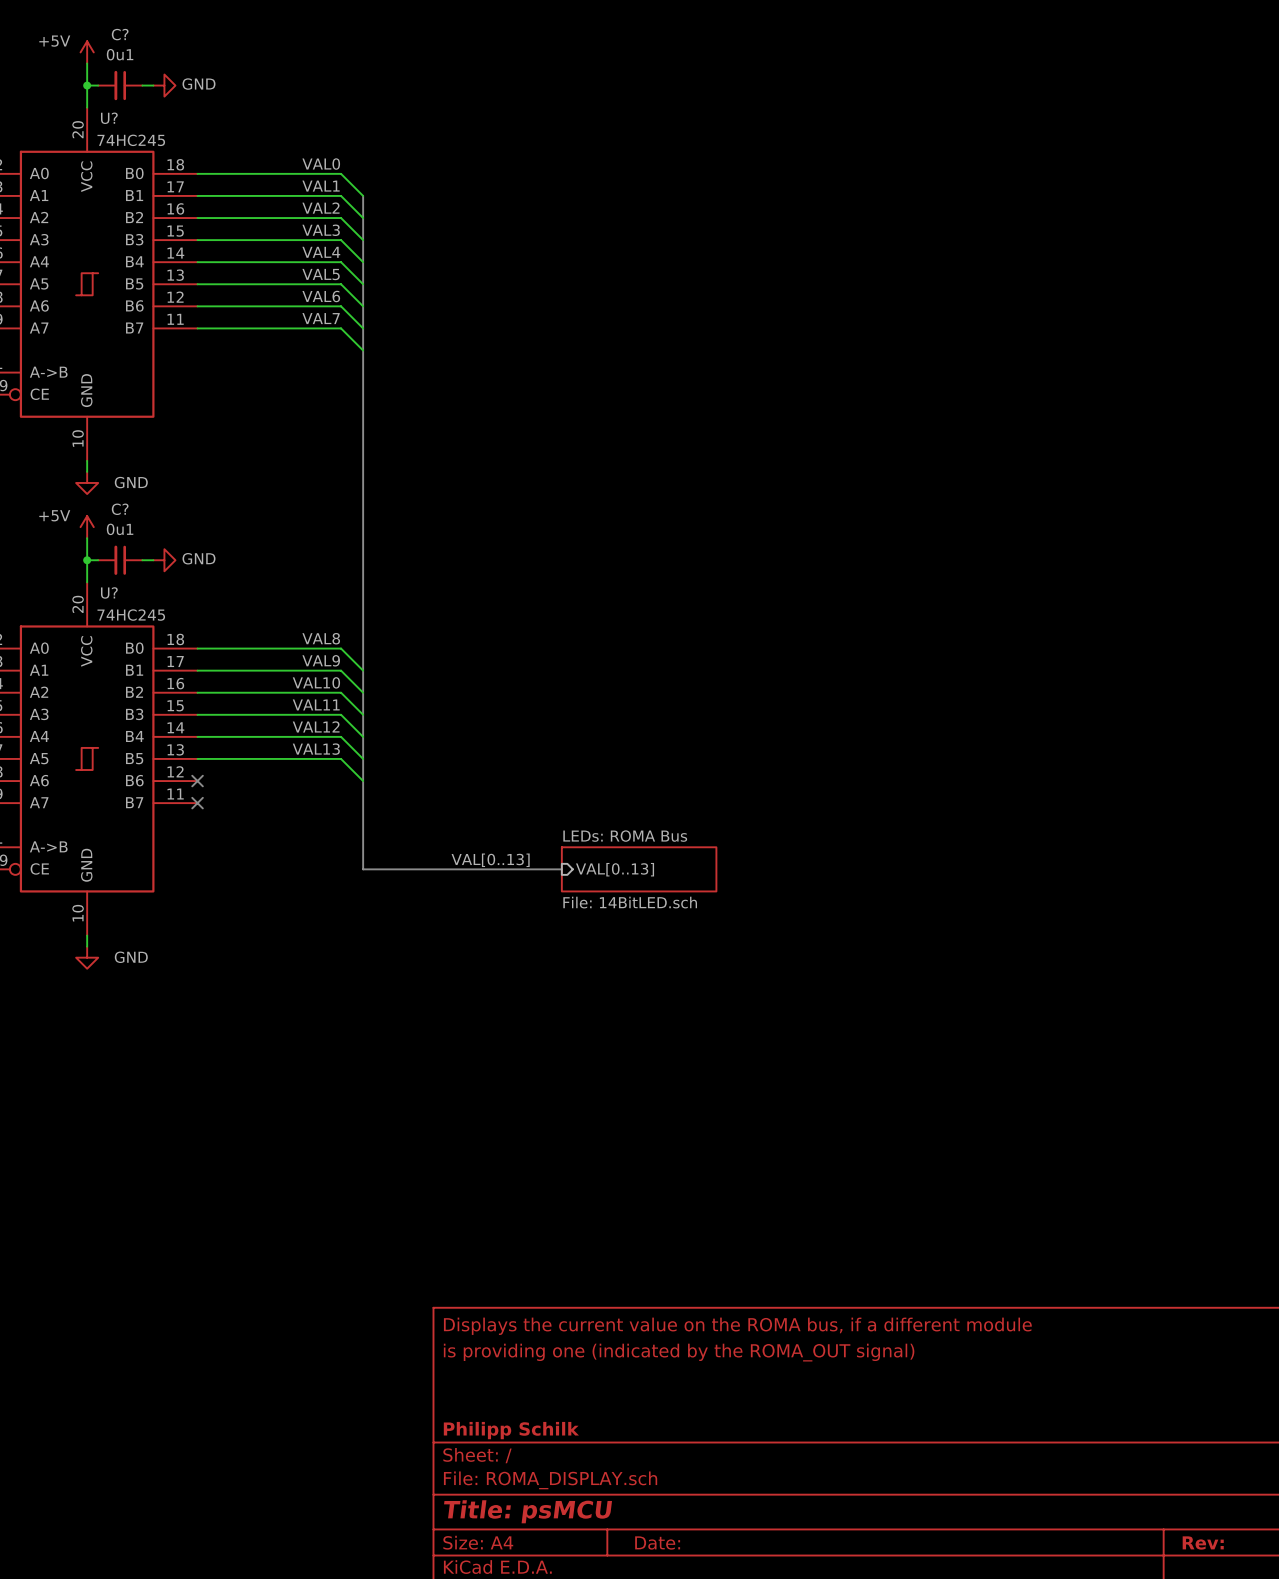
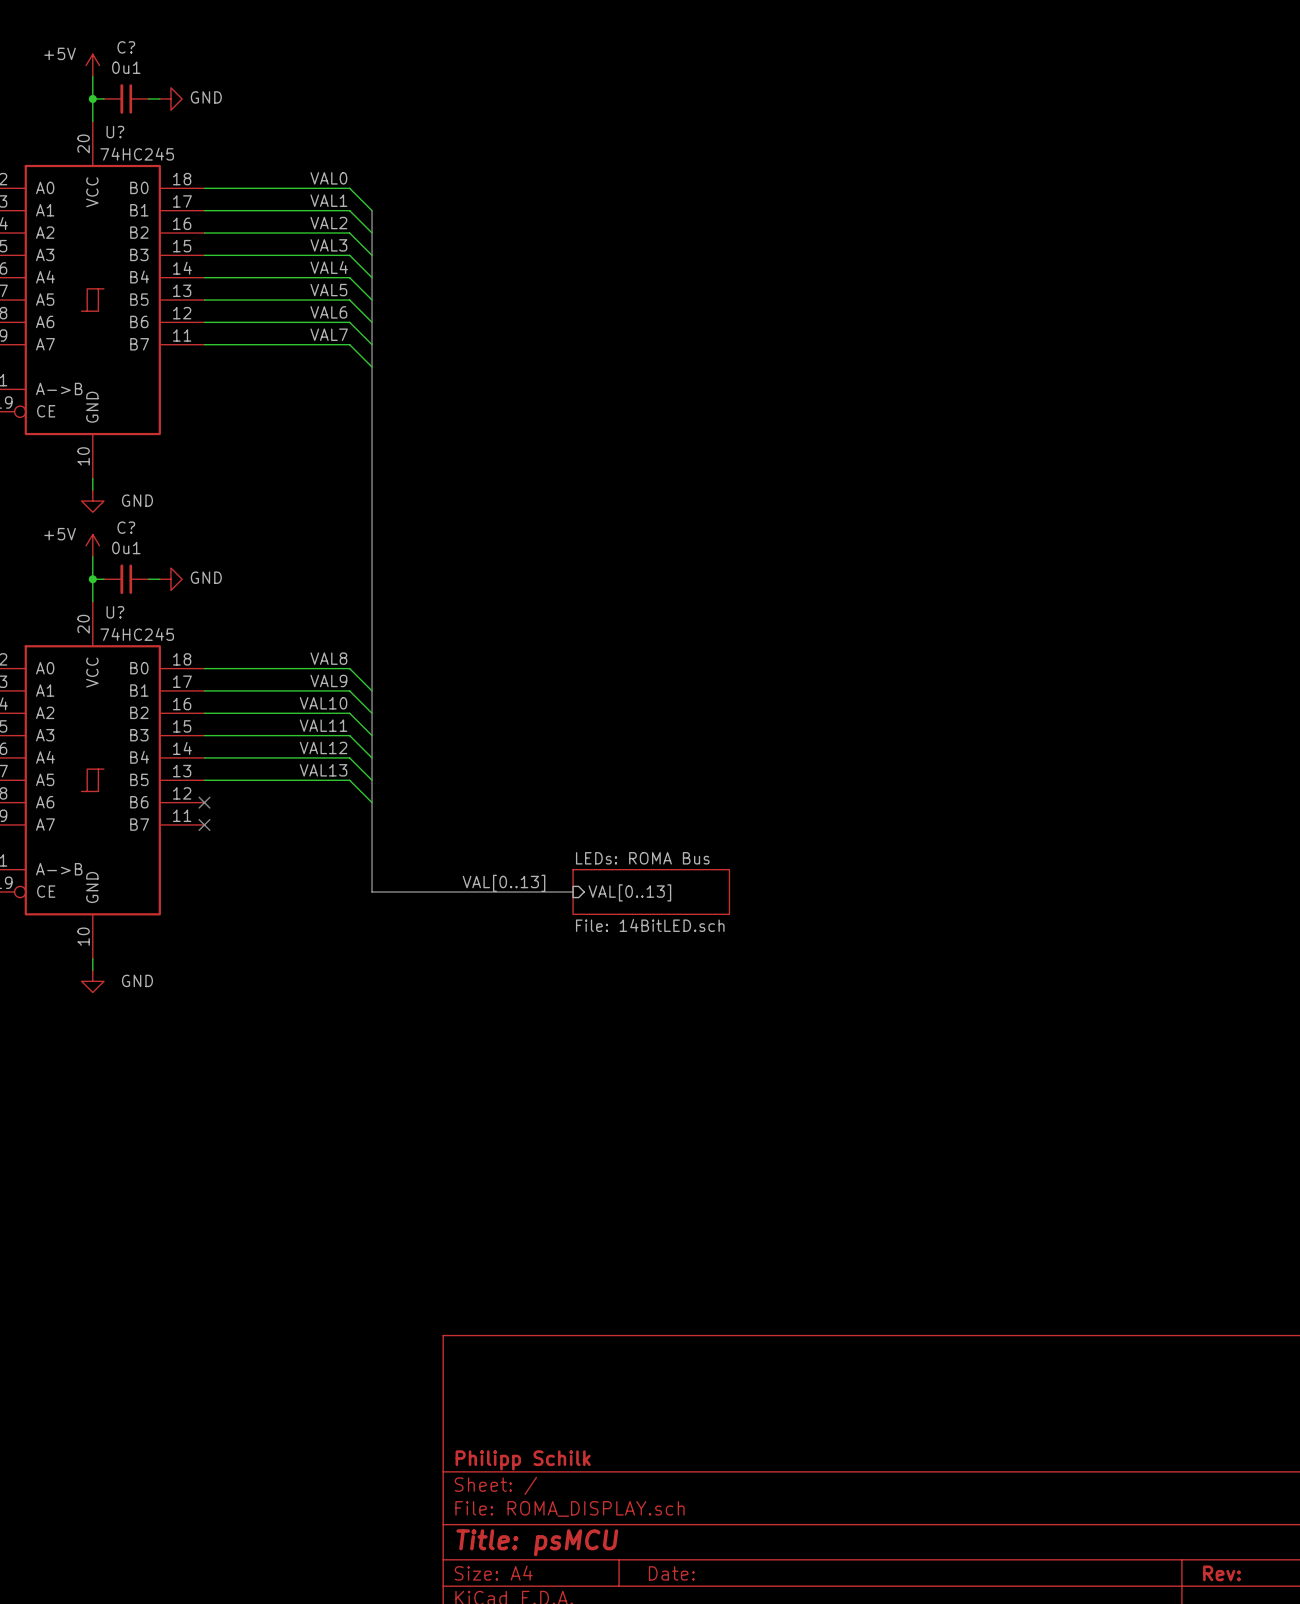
title block: Displays the current value on the ROMA bus, if a different module (737, 1326) -> none
title block: is providing one (indicated by the ROMA_OUT signal) (679, 1352) -> none

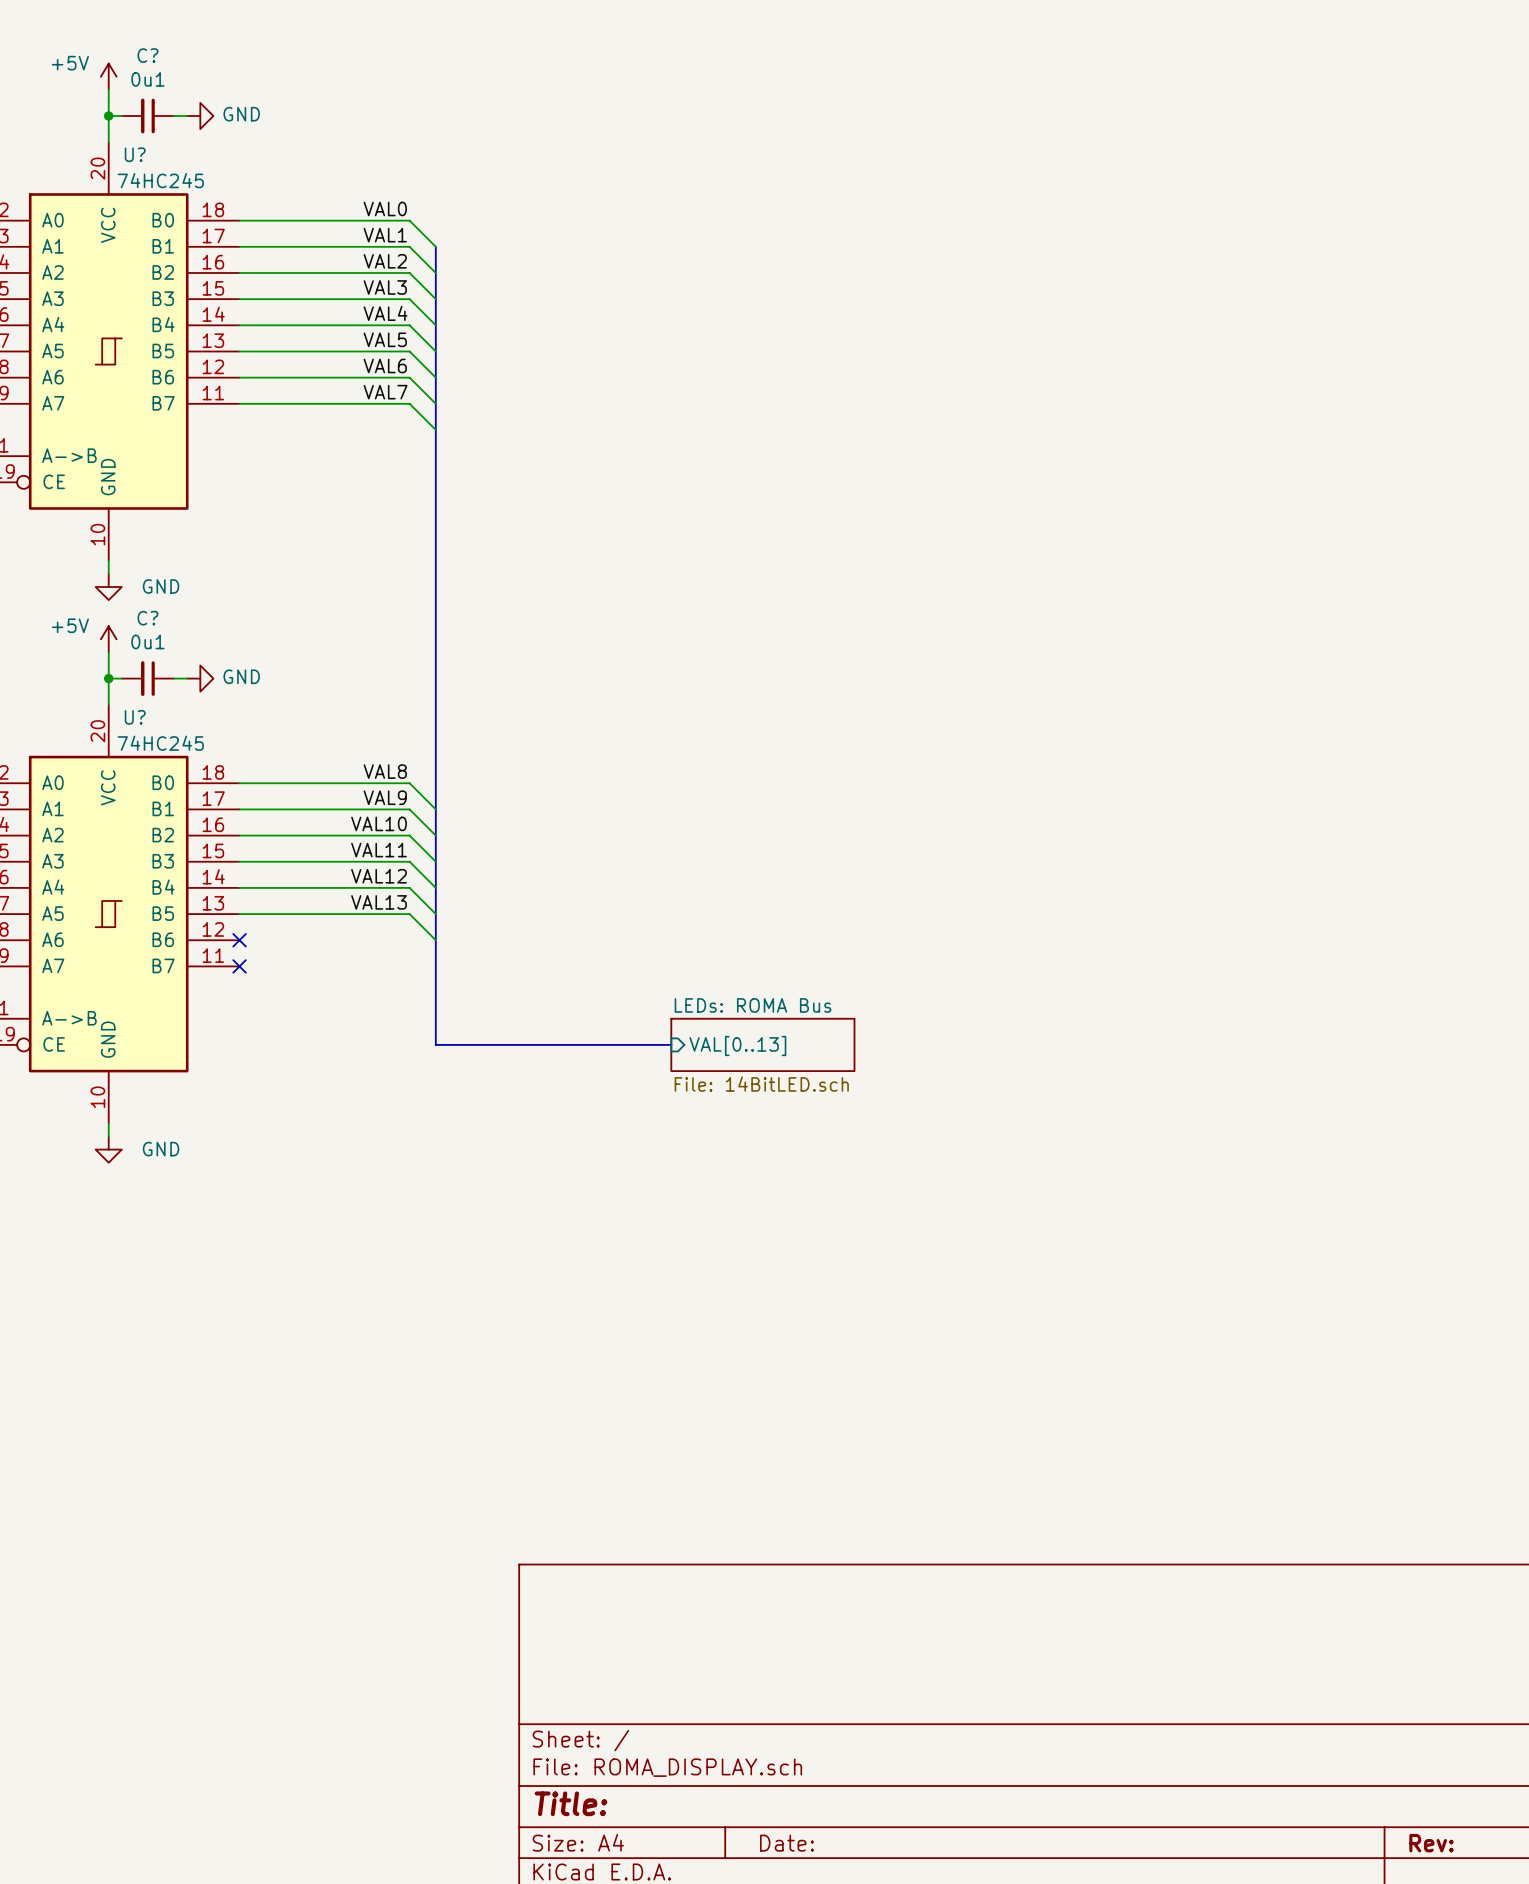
label: VAL[0..13] (504, 883) -> none
title block: Philipp Schilk (523, 1460) -> none
title block: Title: psMCU (537, 1542) -> Title: (571, 1803)

